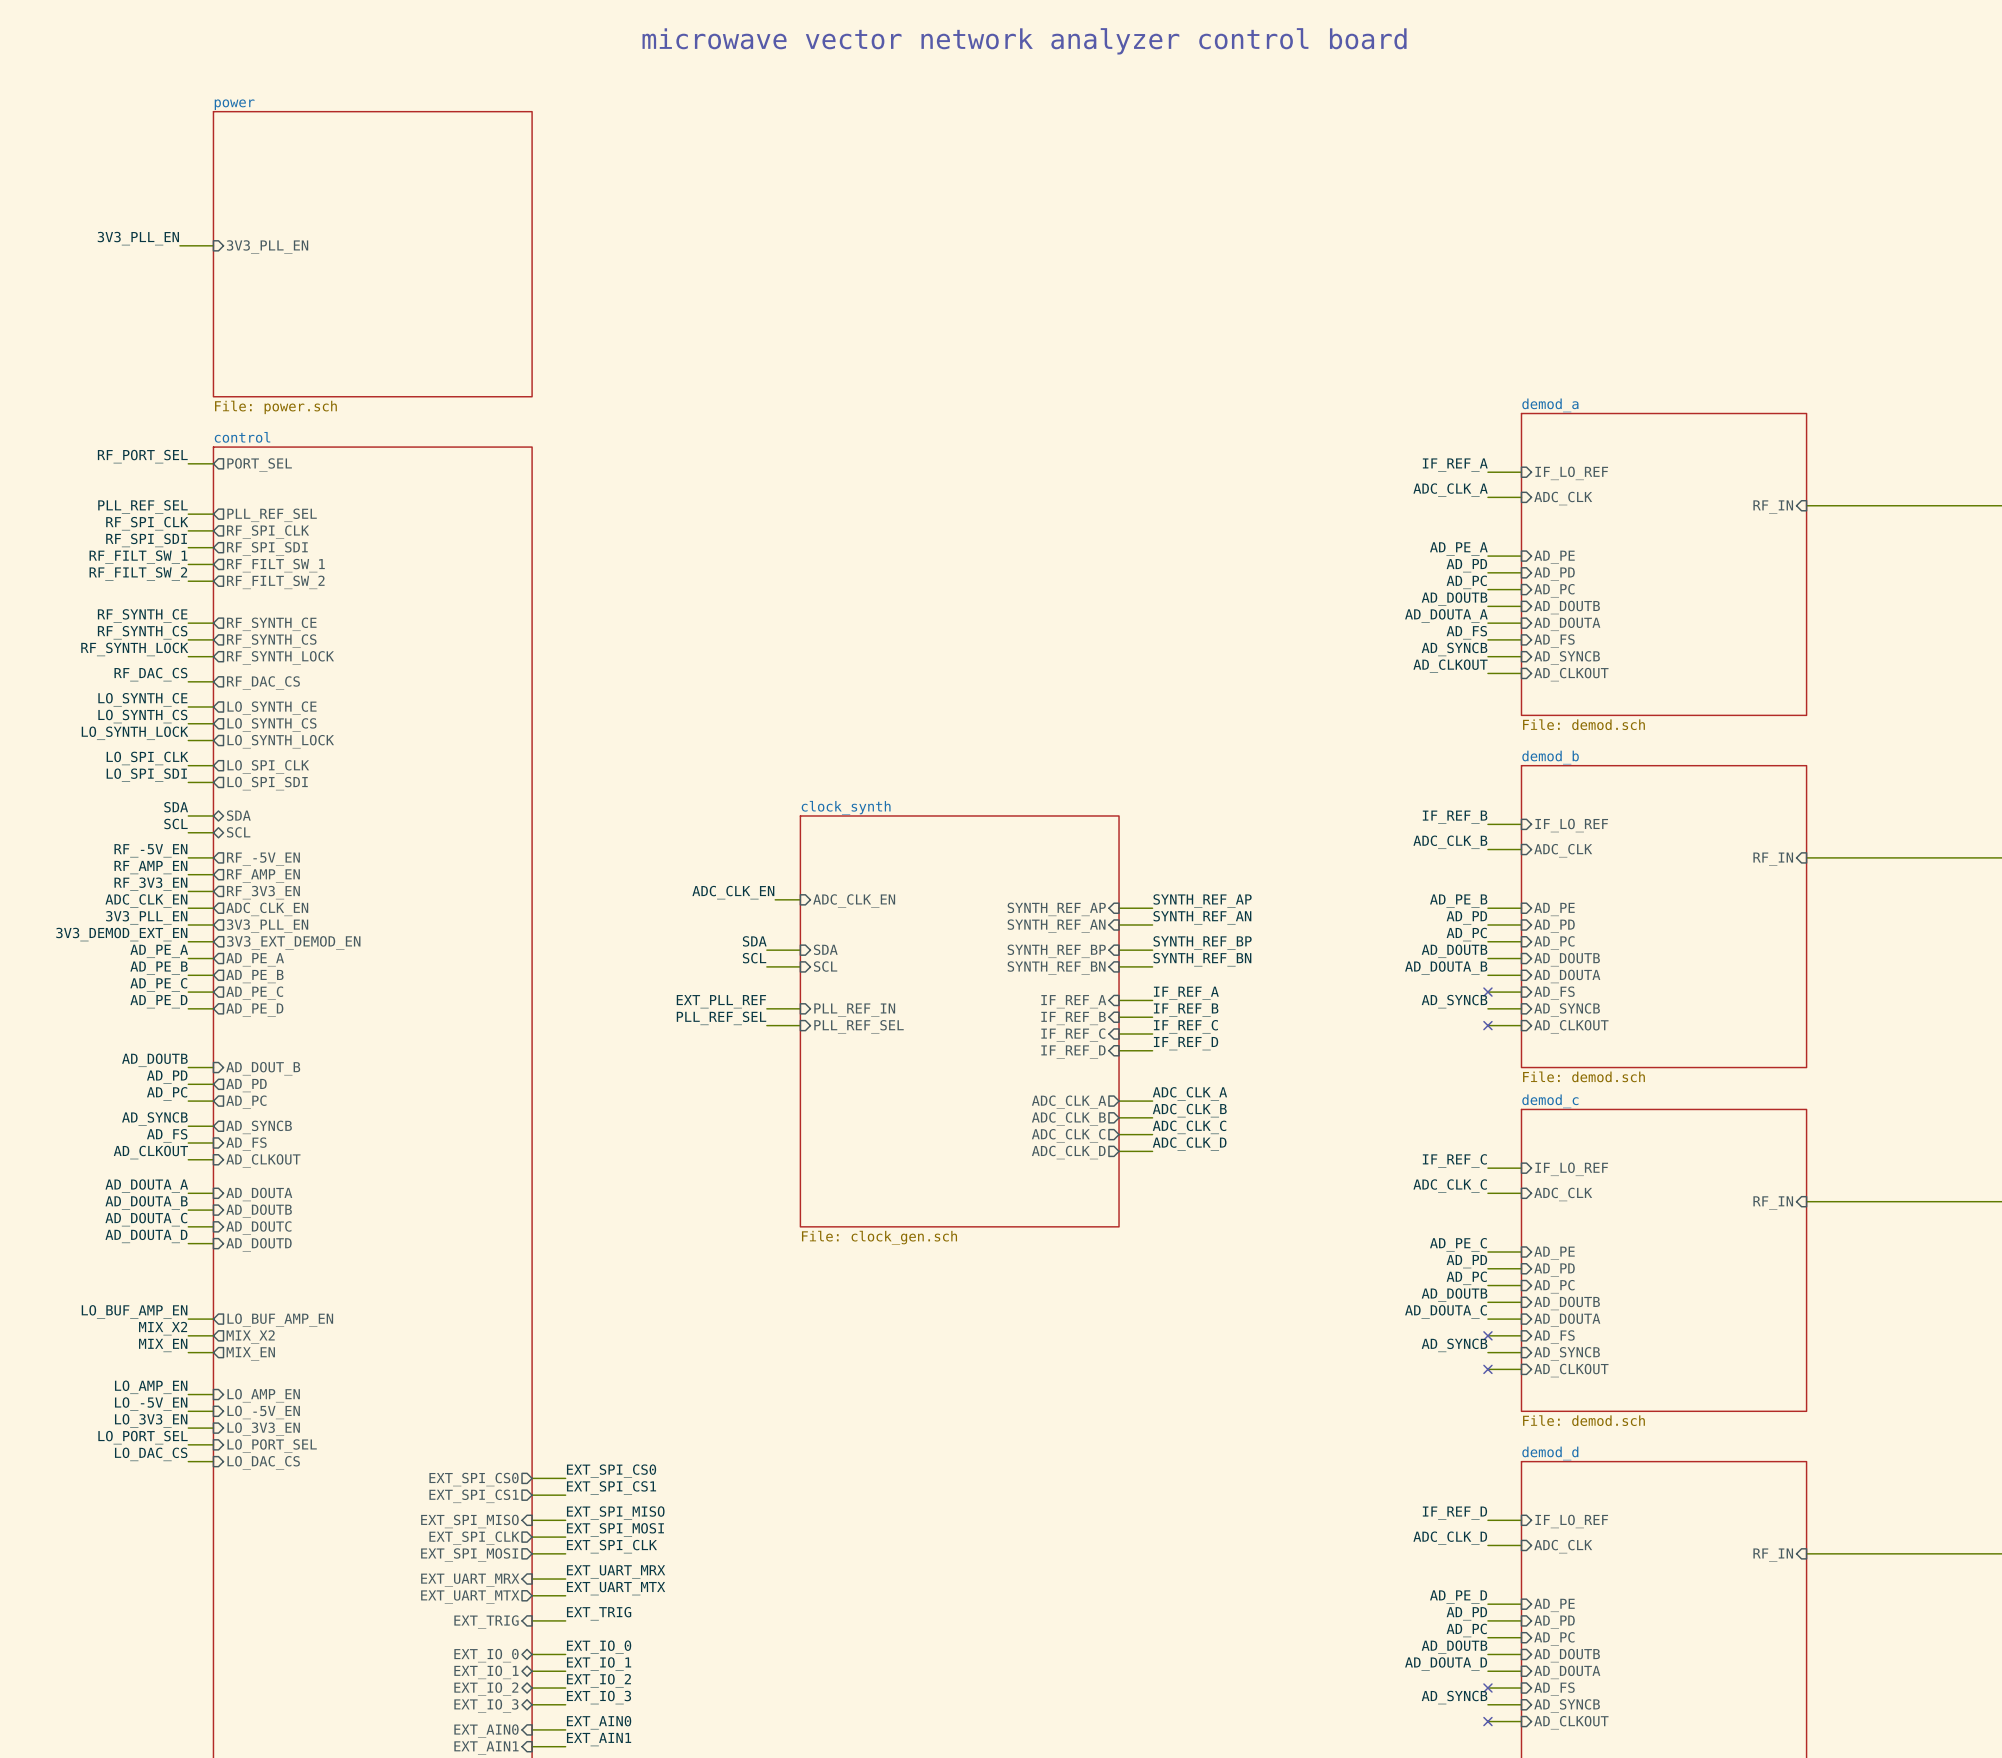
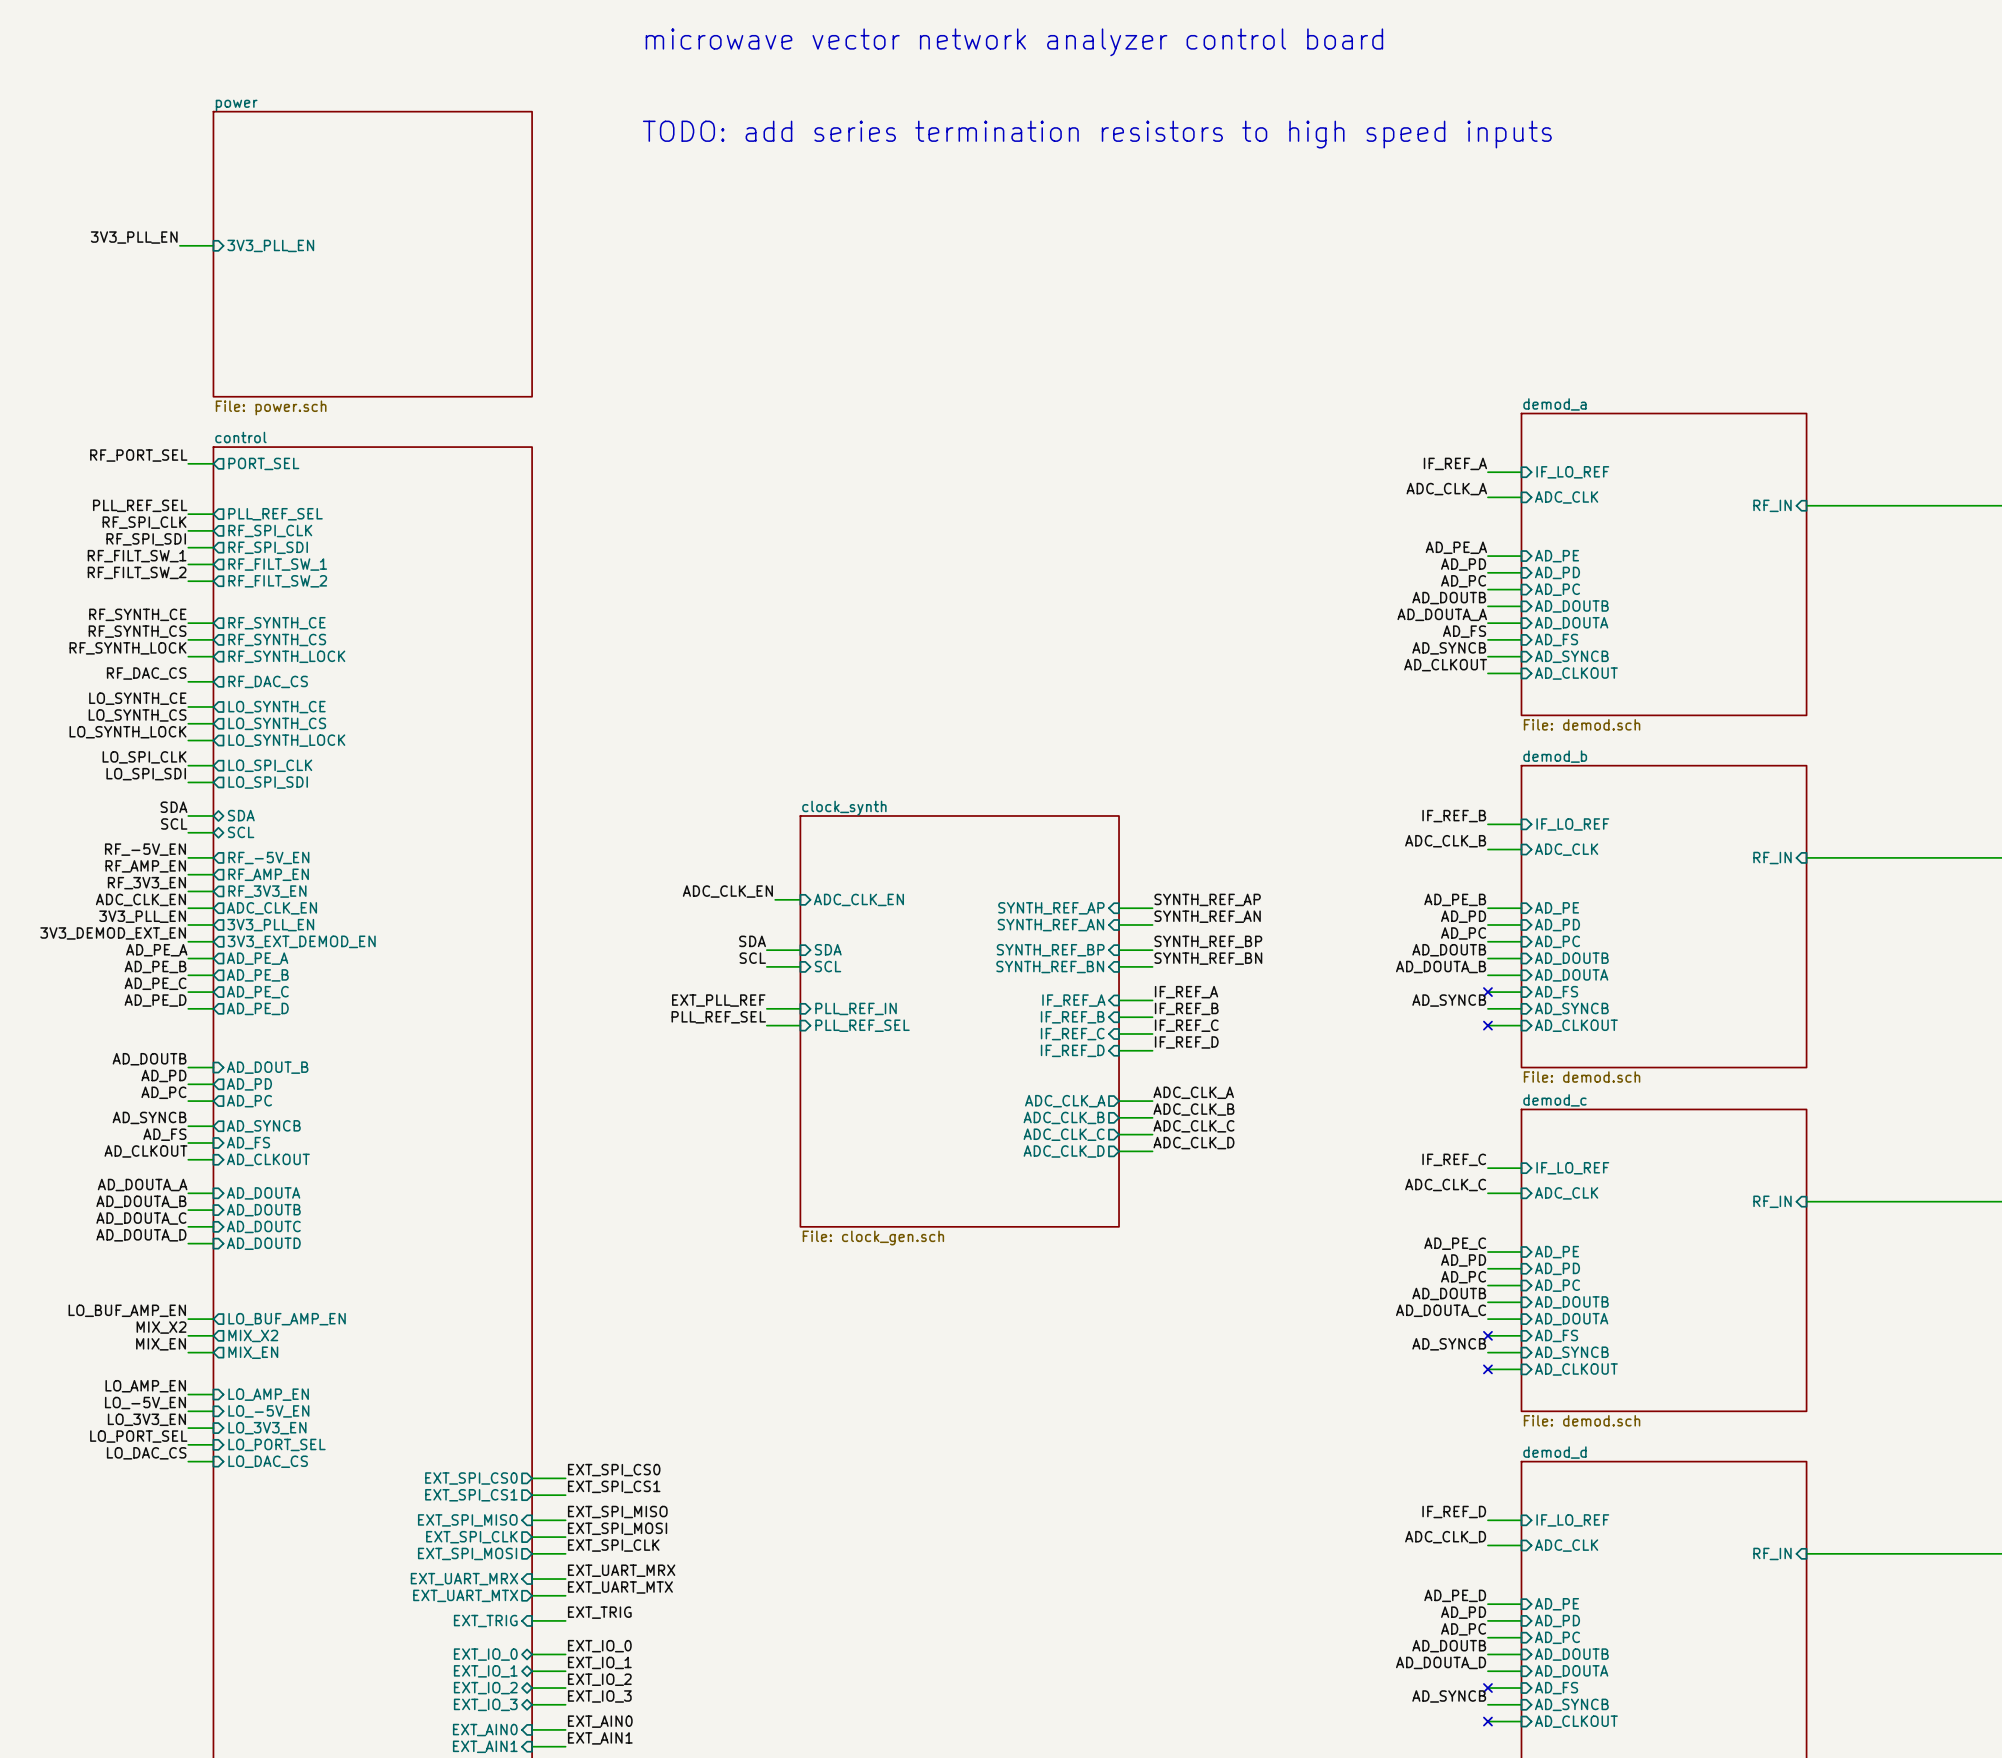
text: none -> TODO: add series termination resistors to high speed inputs (1097, 134)

